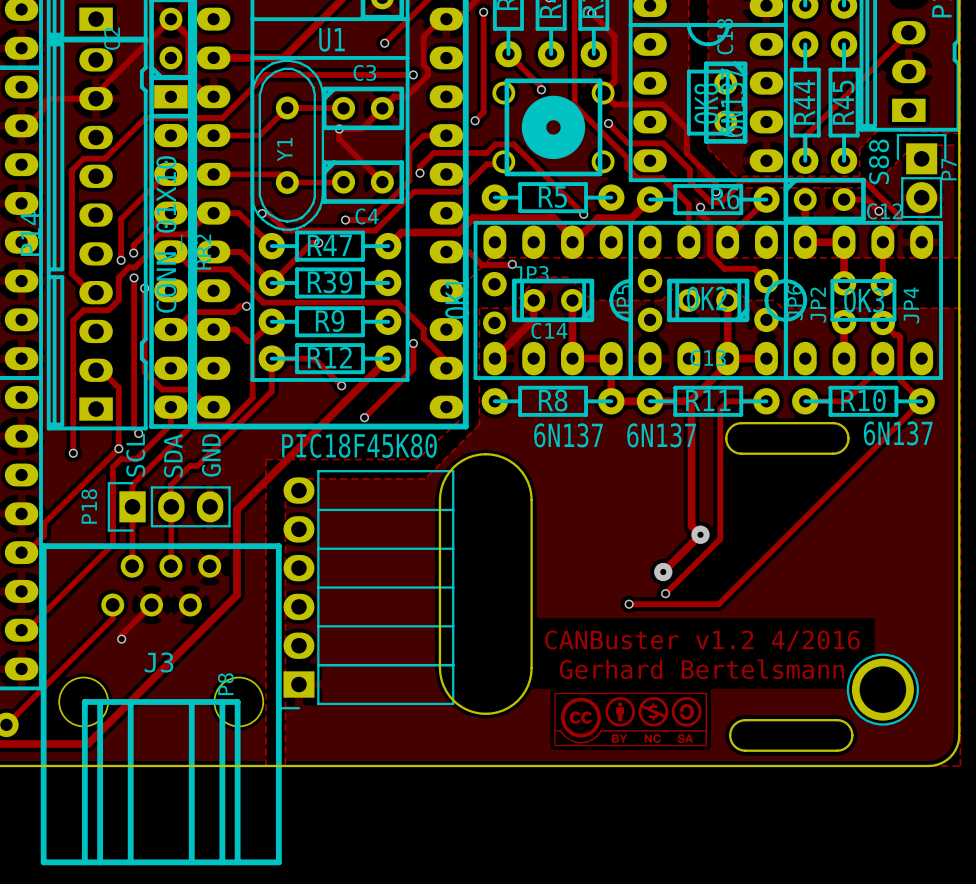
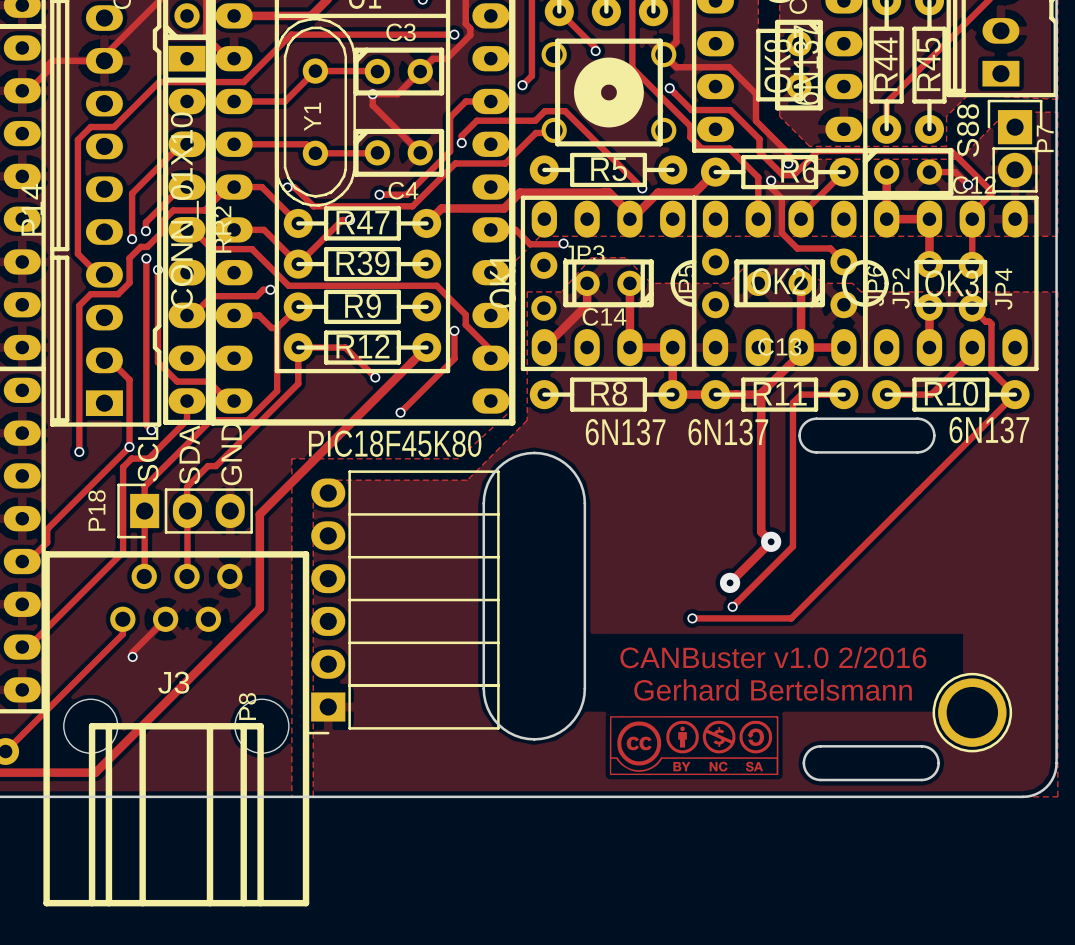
text: CANBuster v1.2 4/2016 (702, 640) -> CANBuster v1.0 2/2016 (773, 657)

